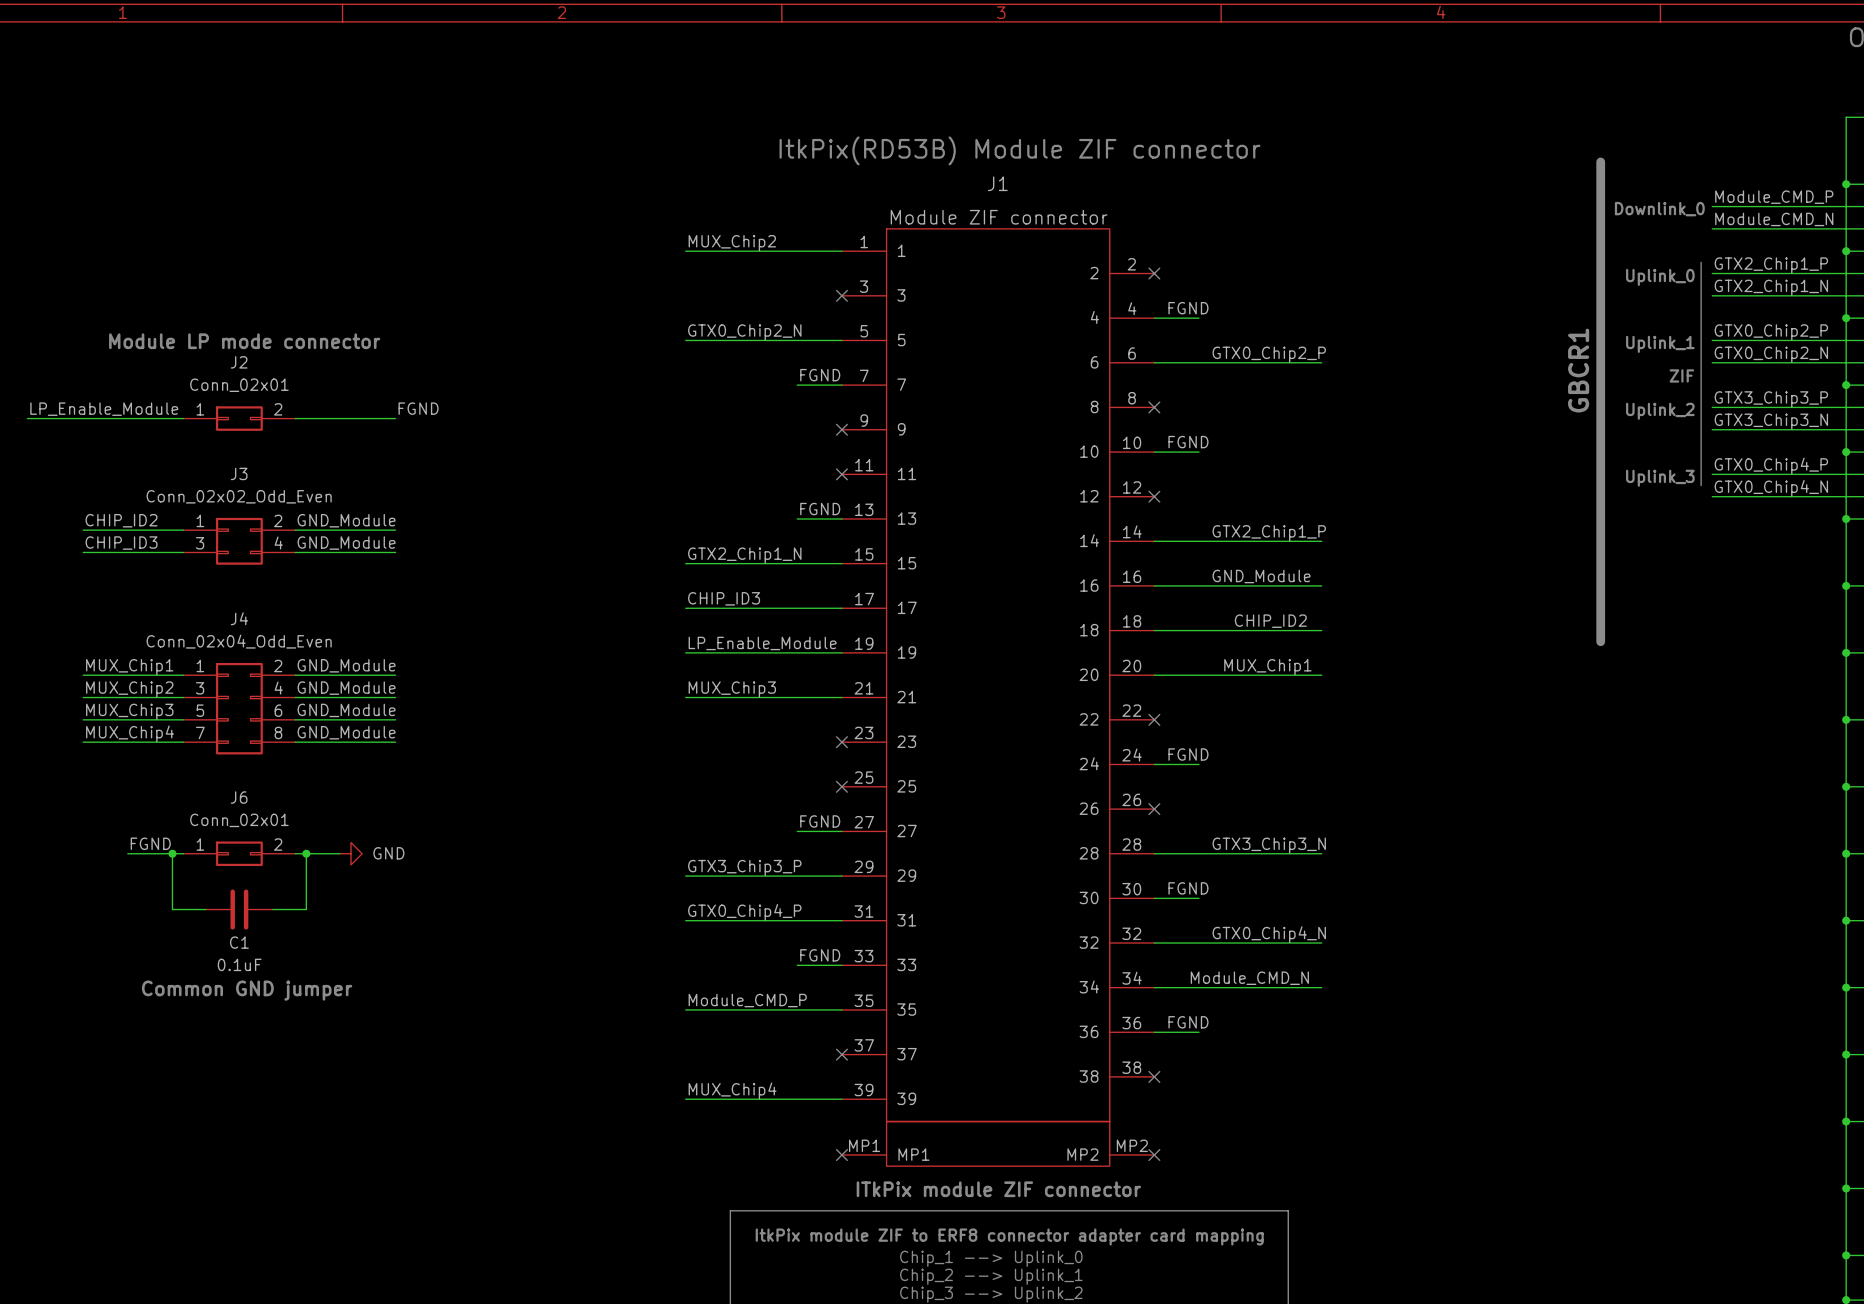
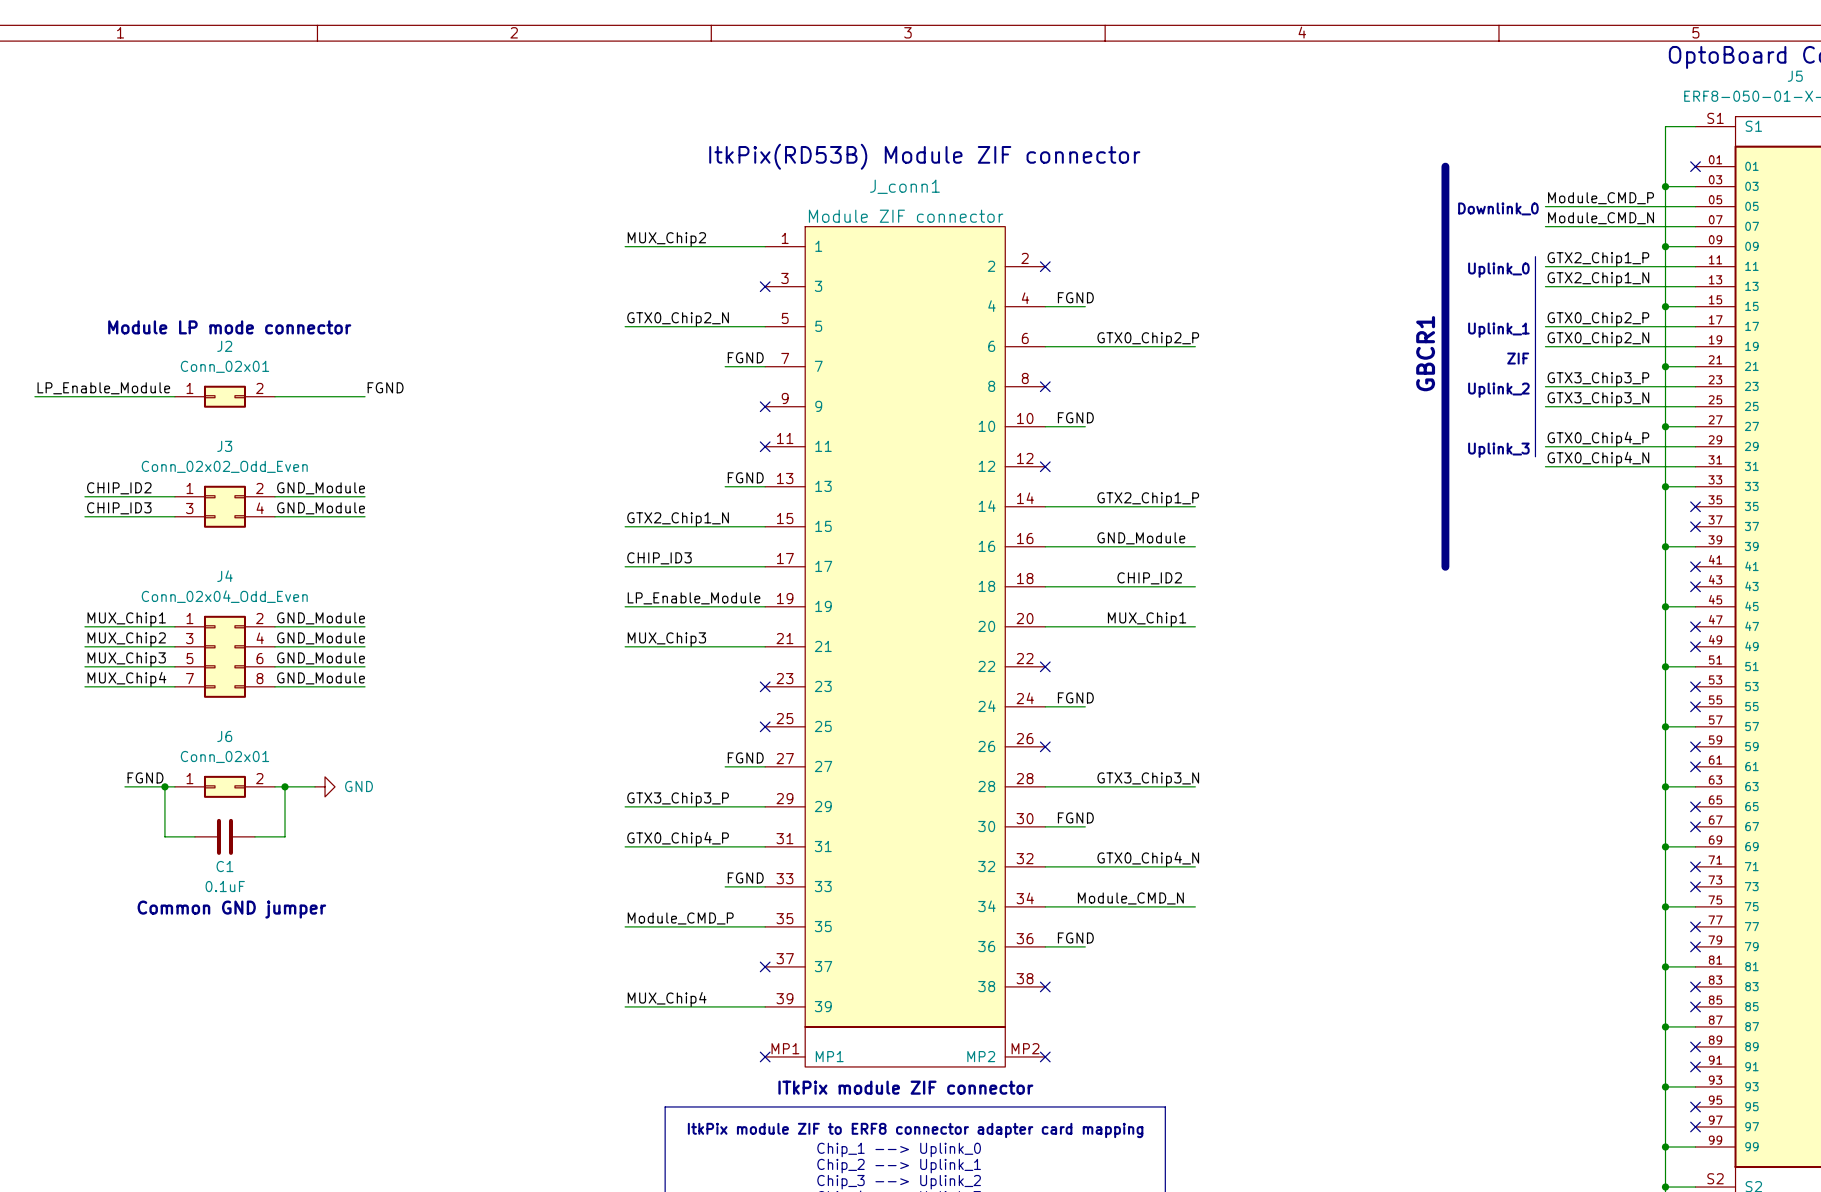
J1 name: J1 (997, 183) -> J_conn1 (904, 186)
line: (1600, 608) (1600, 641) -> none

